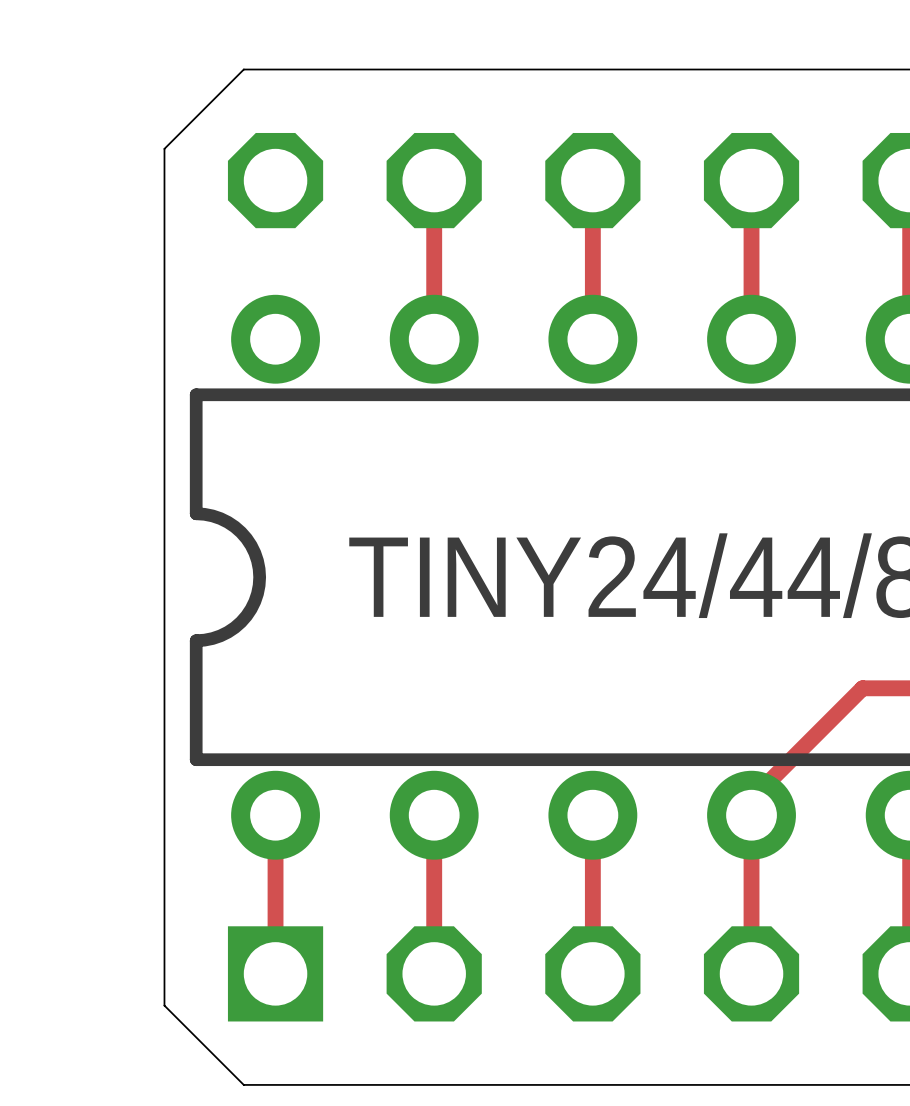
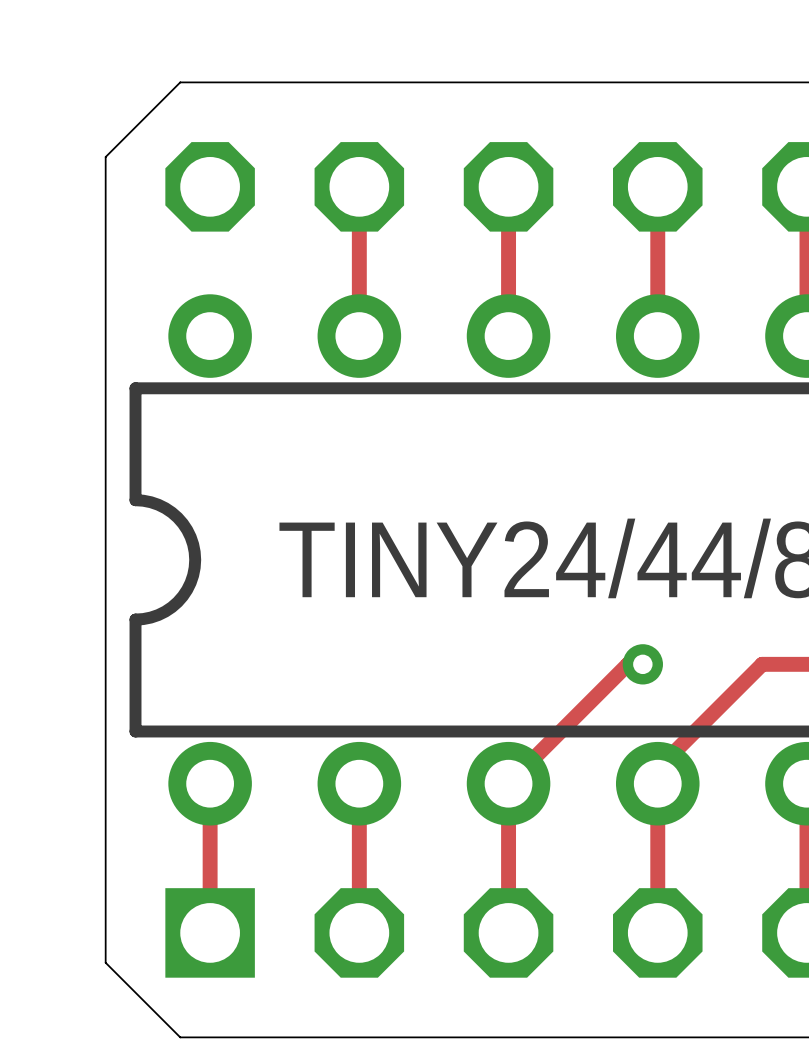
track: none -> (642, 664) (627, 664) (508, 783)
via: none -> (642, 664)

